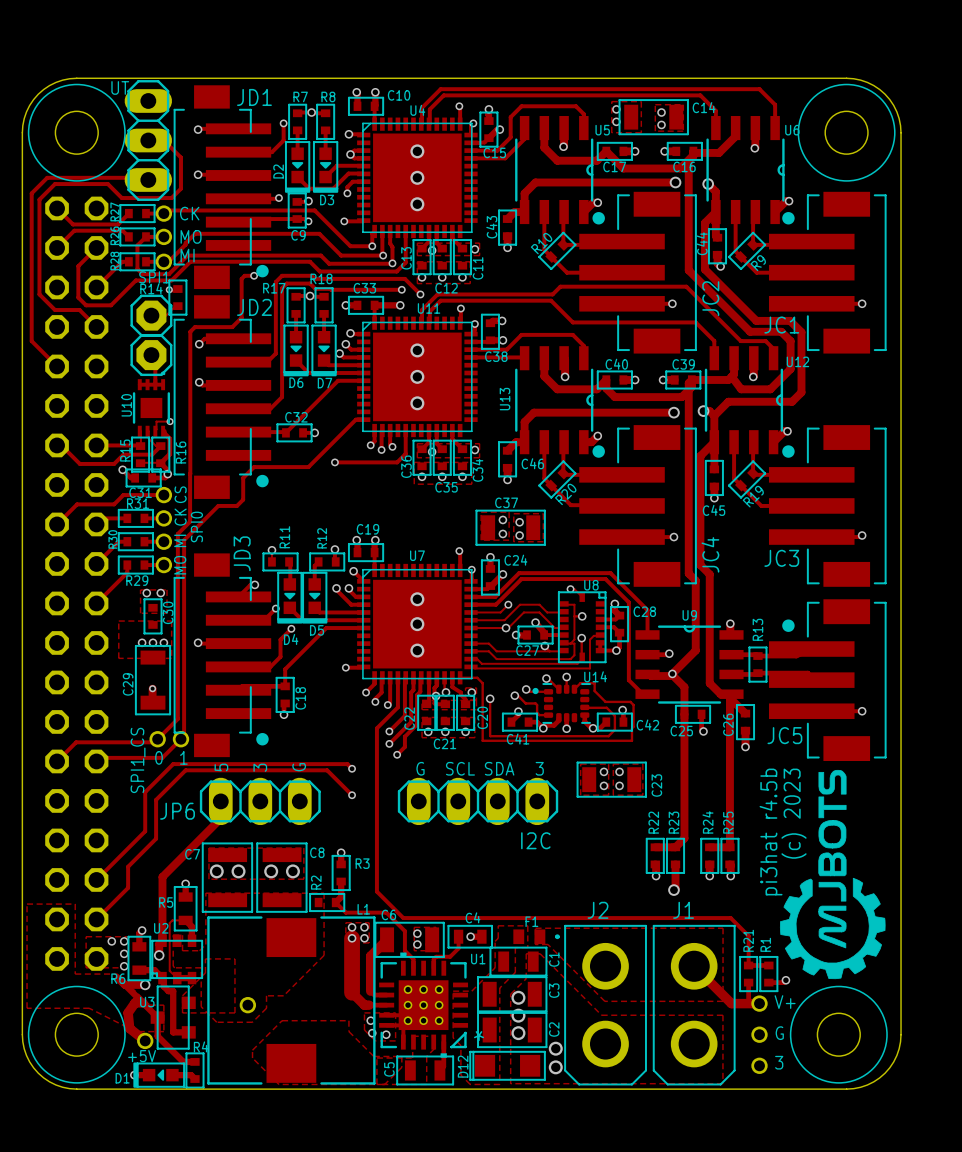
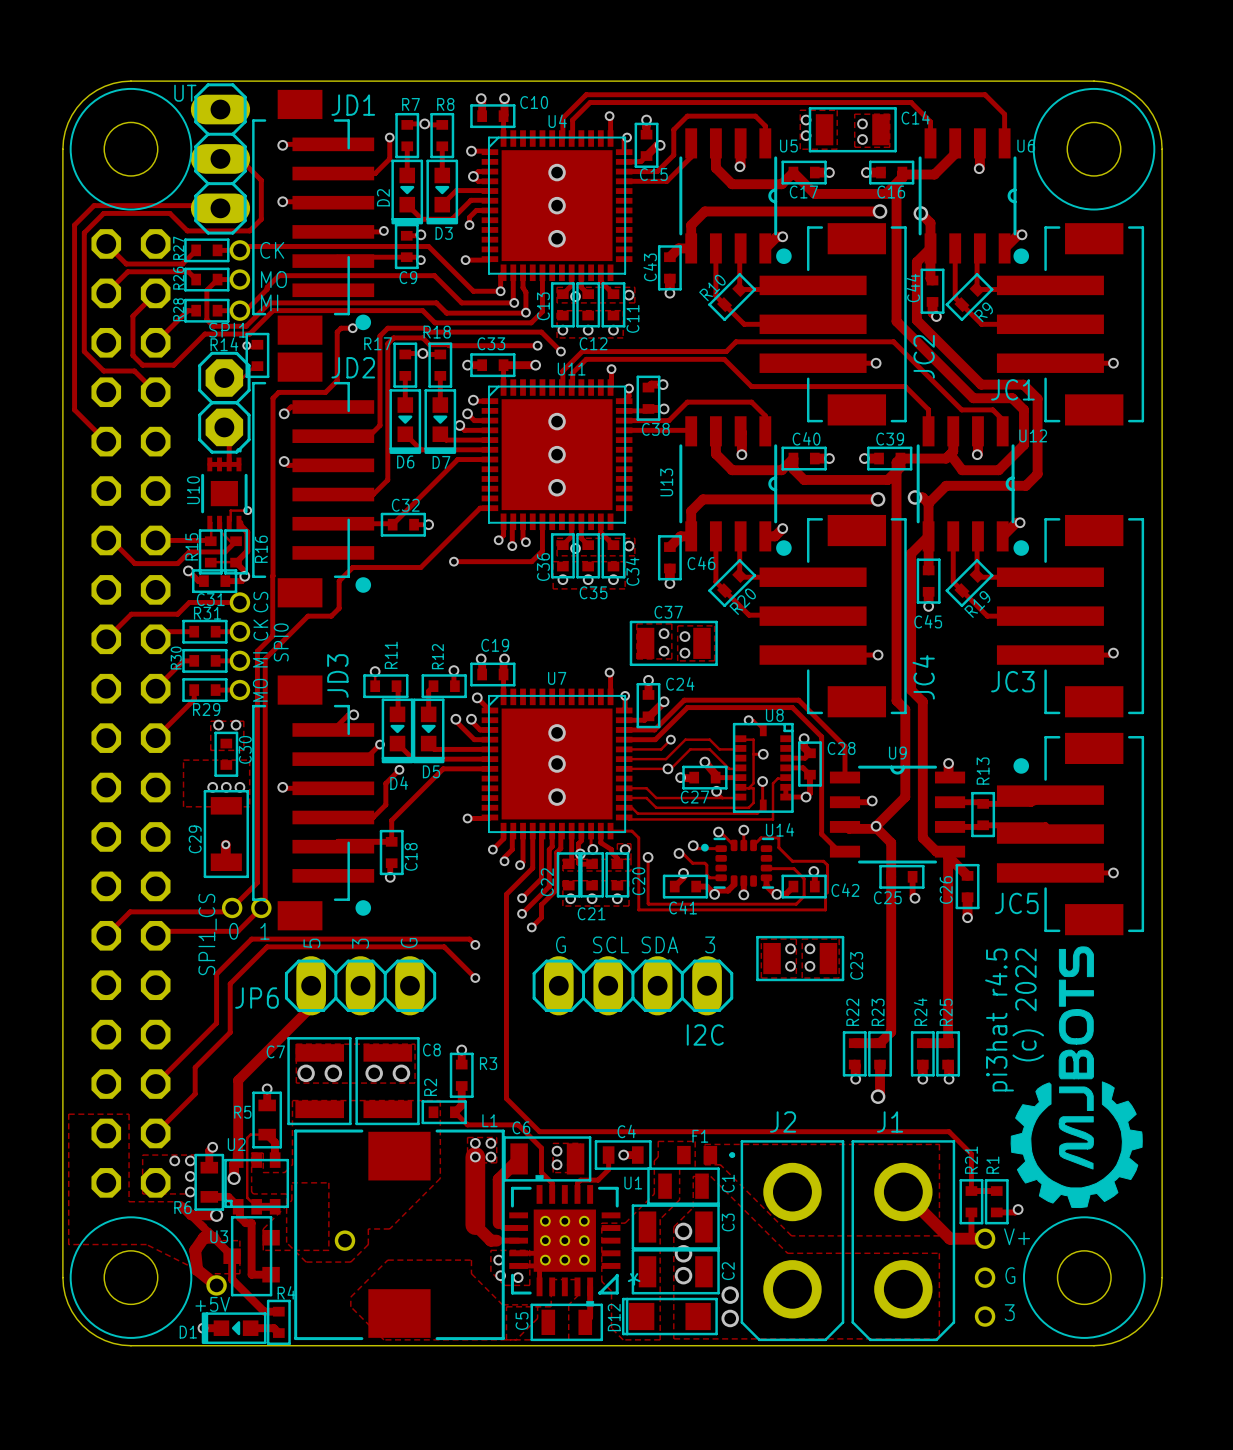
text: (c) 2023 (794, 813) -> (c) 2022 (1028, 1004)
text: pi3hat r4.5b (771, 832) -> pi3hat r4.5 (999, 1020)

